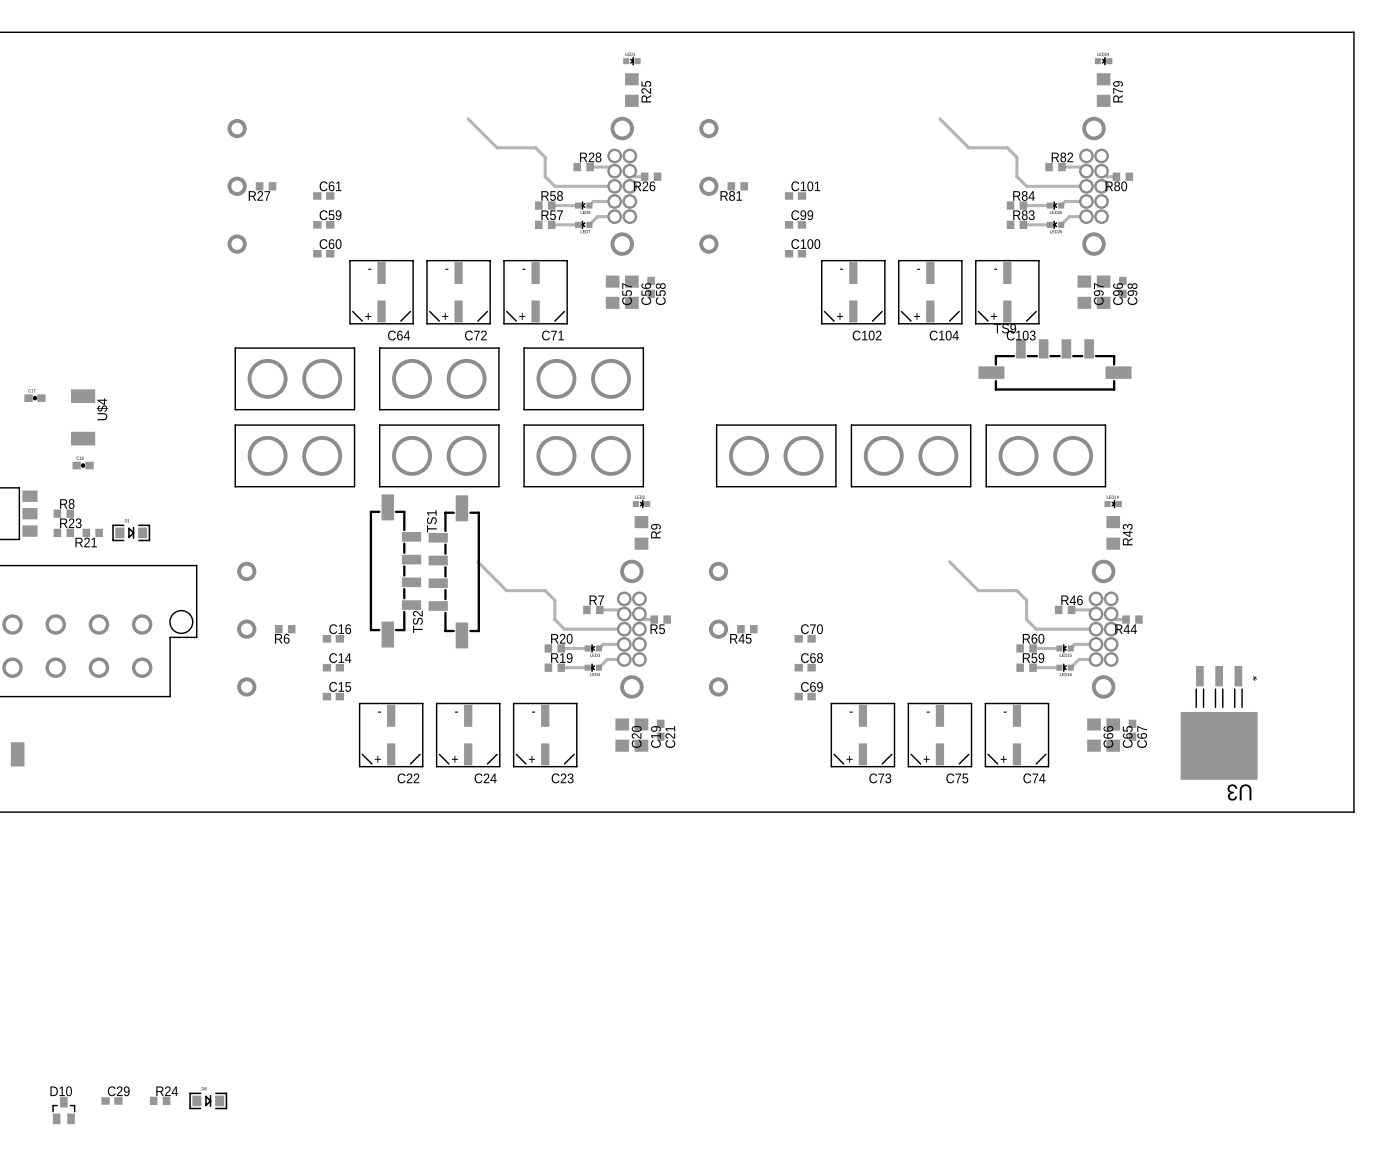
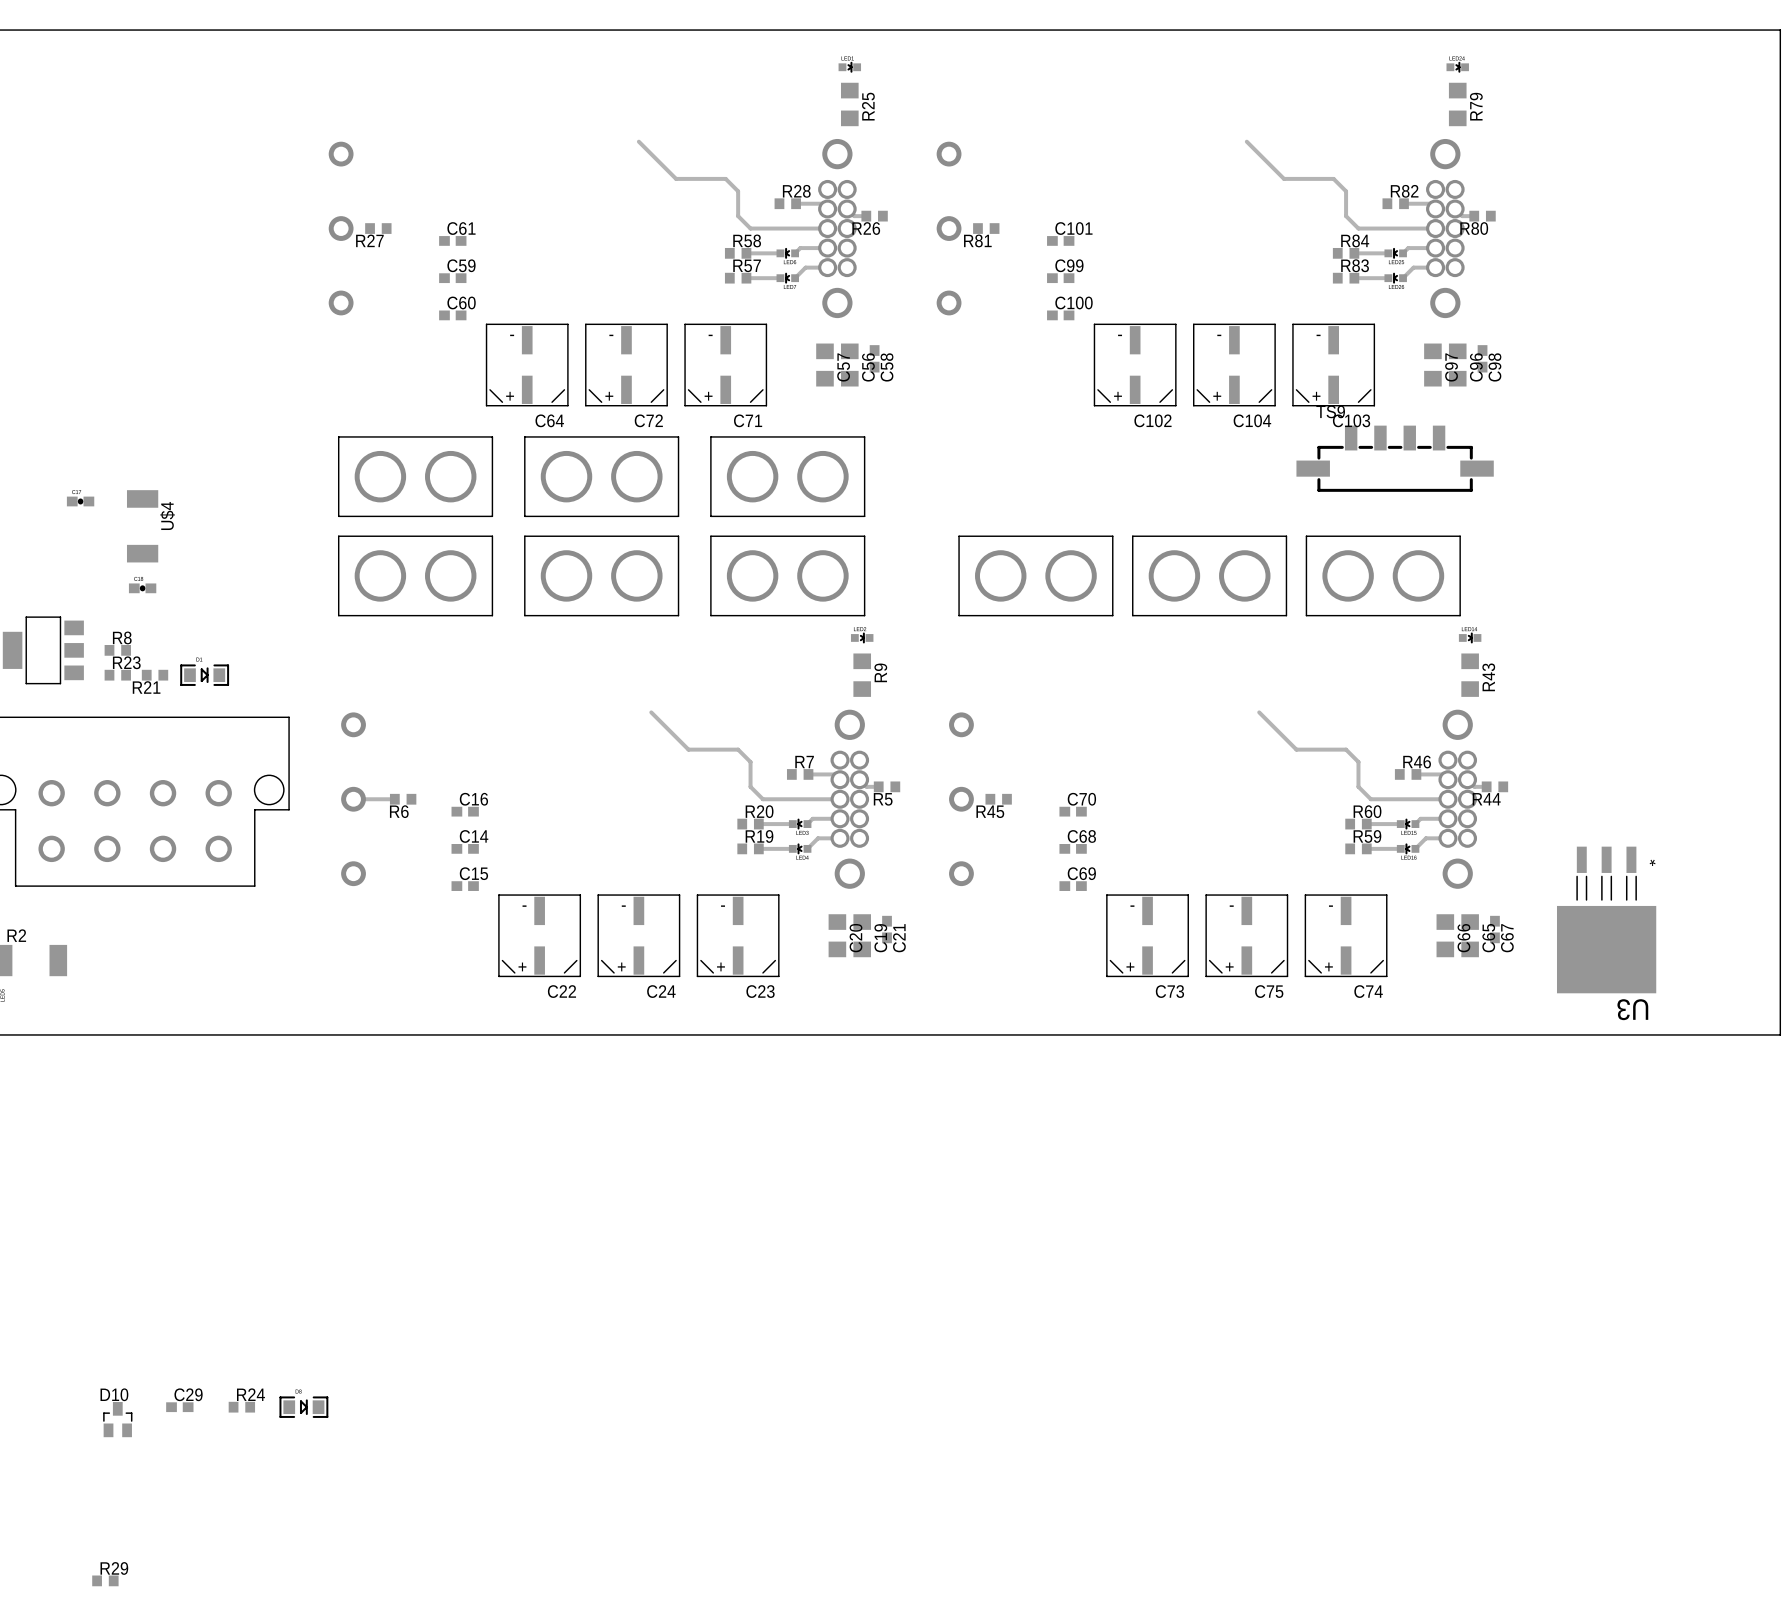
TS1: (395, 570) -> none
TS2: (454, 571) -> none
track: none -> (353, 799) (394, 799)

